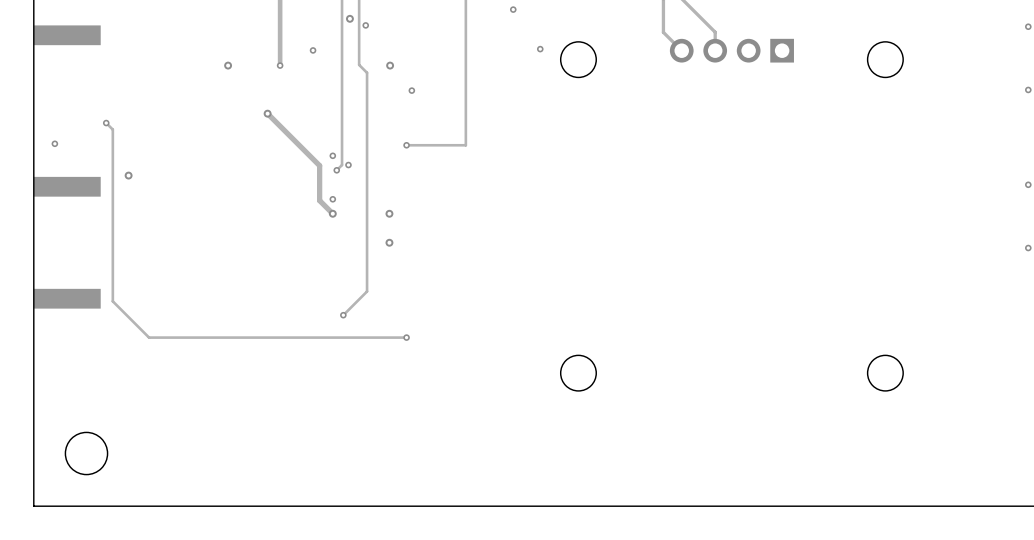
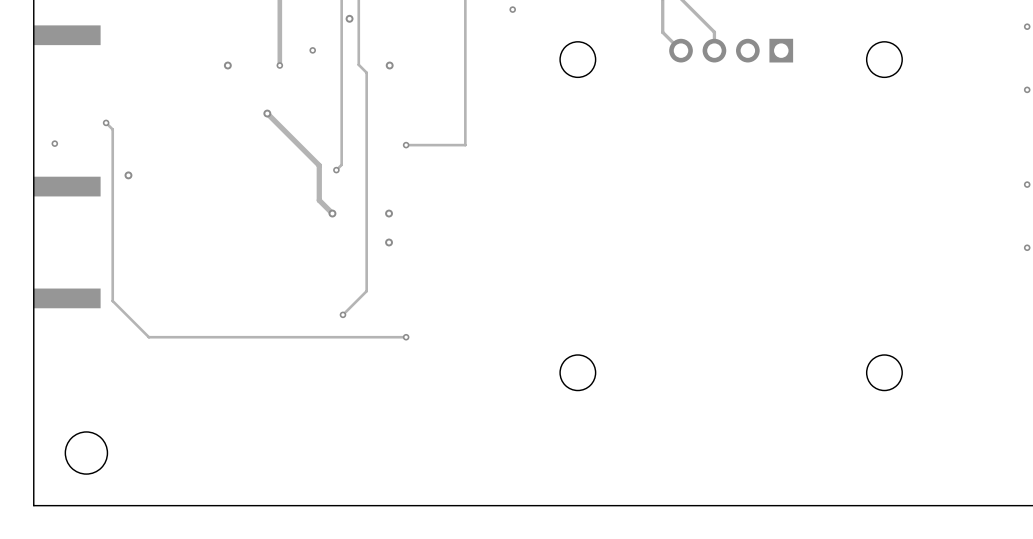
via: (365, 25) -> none
via: (540, 49) -> none
via: (411, 90) -> none
via: (332, 155) -> none
via: (348, 165) -> none
via: (332, 199) -> none

